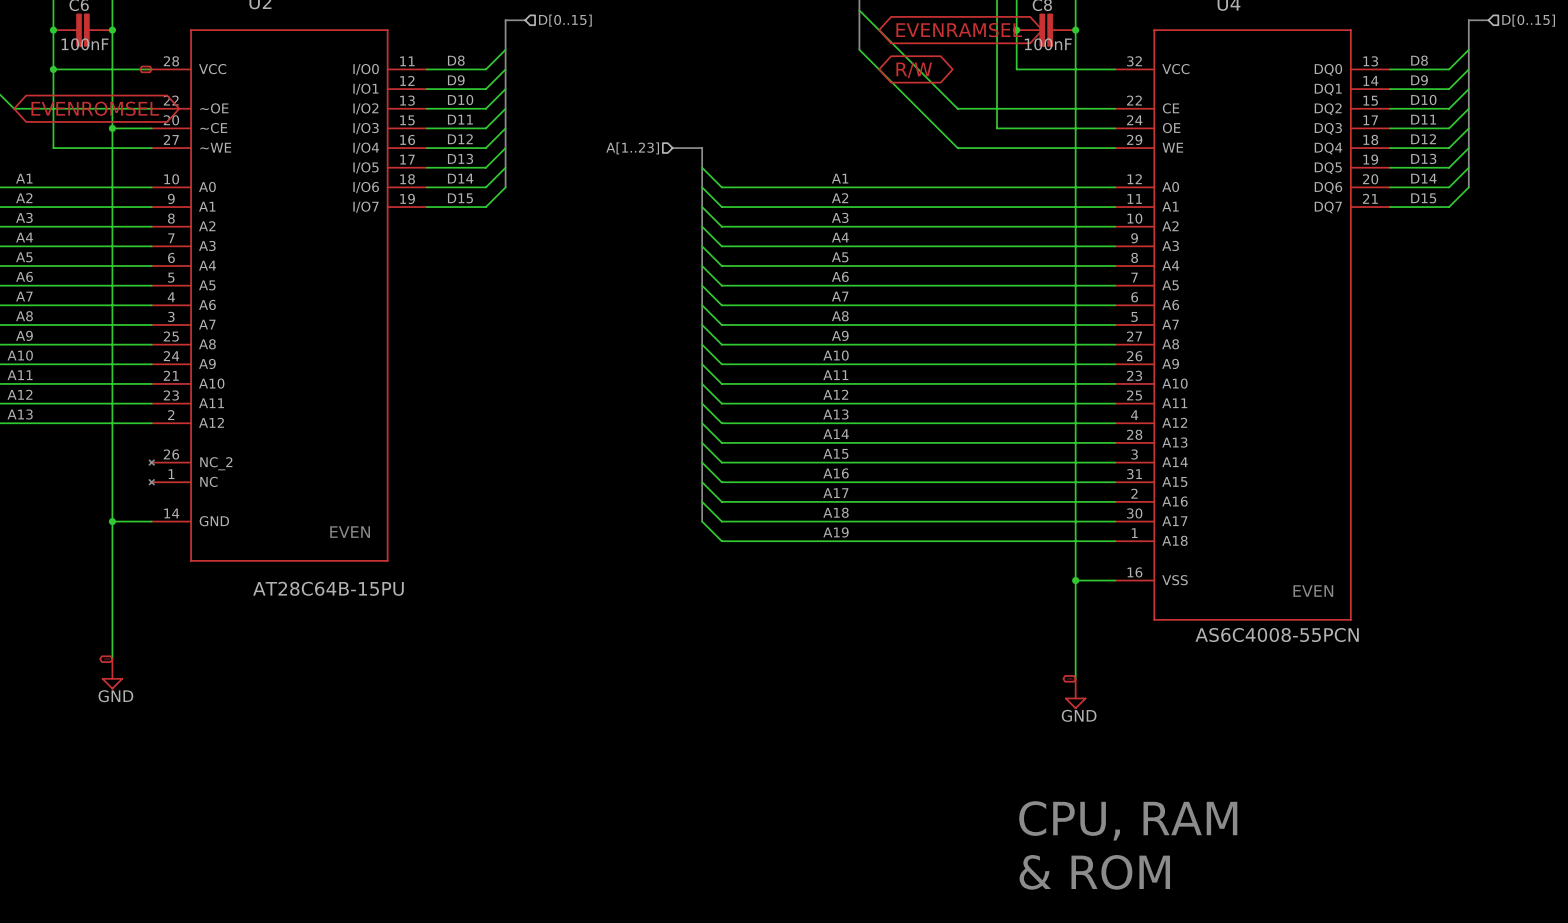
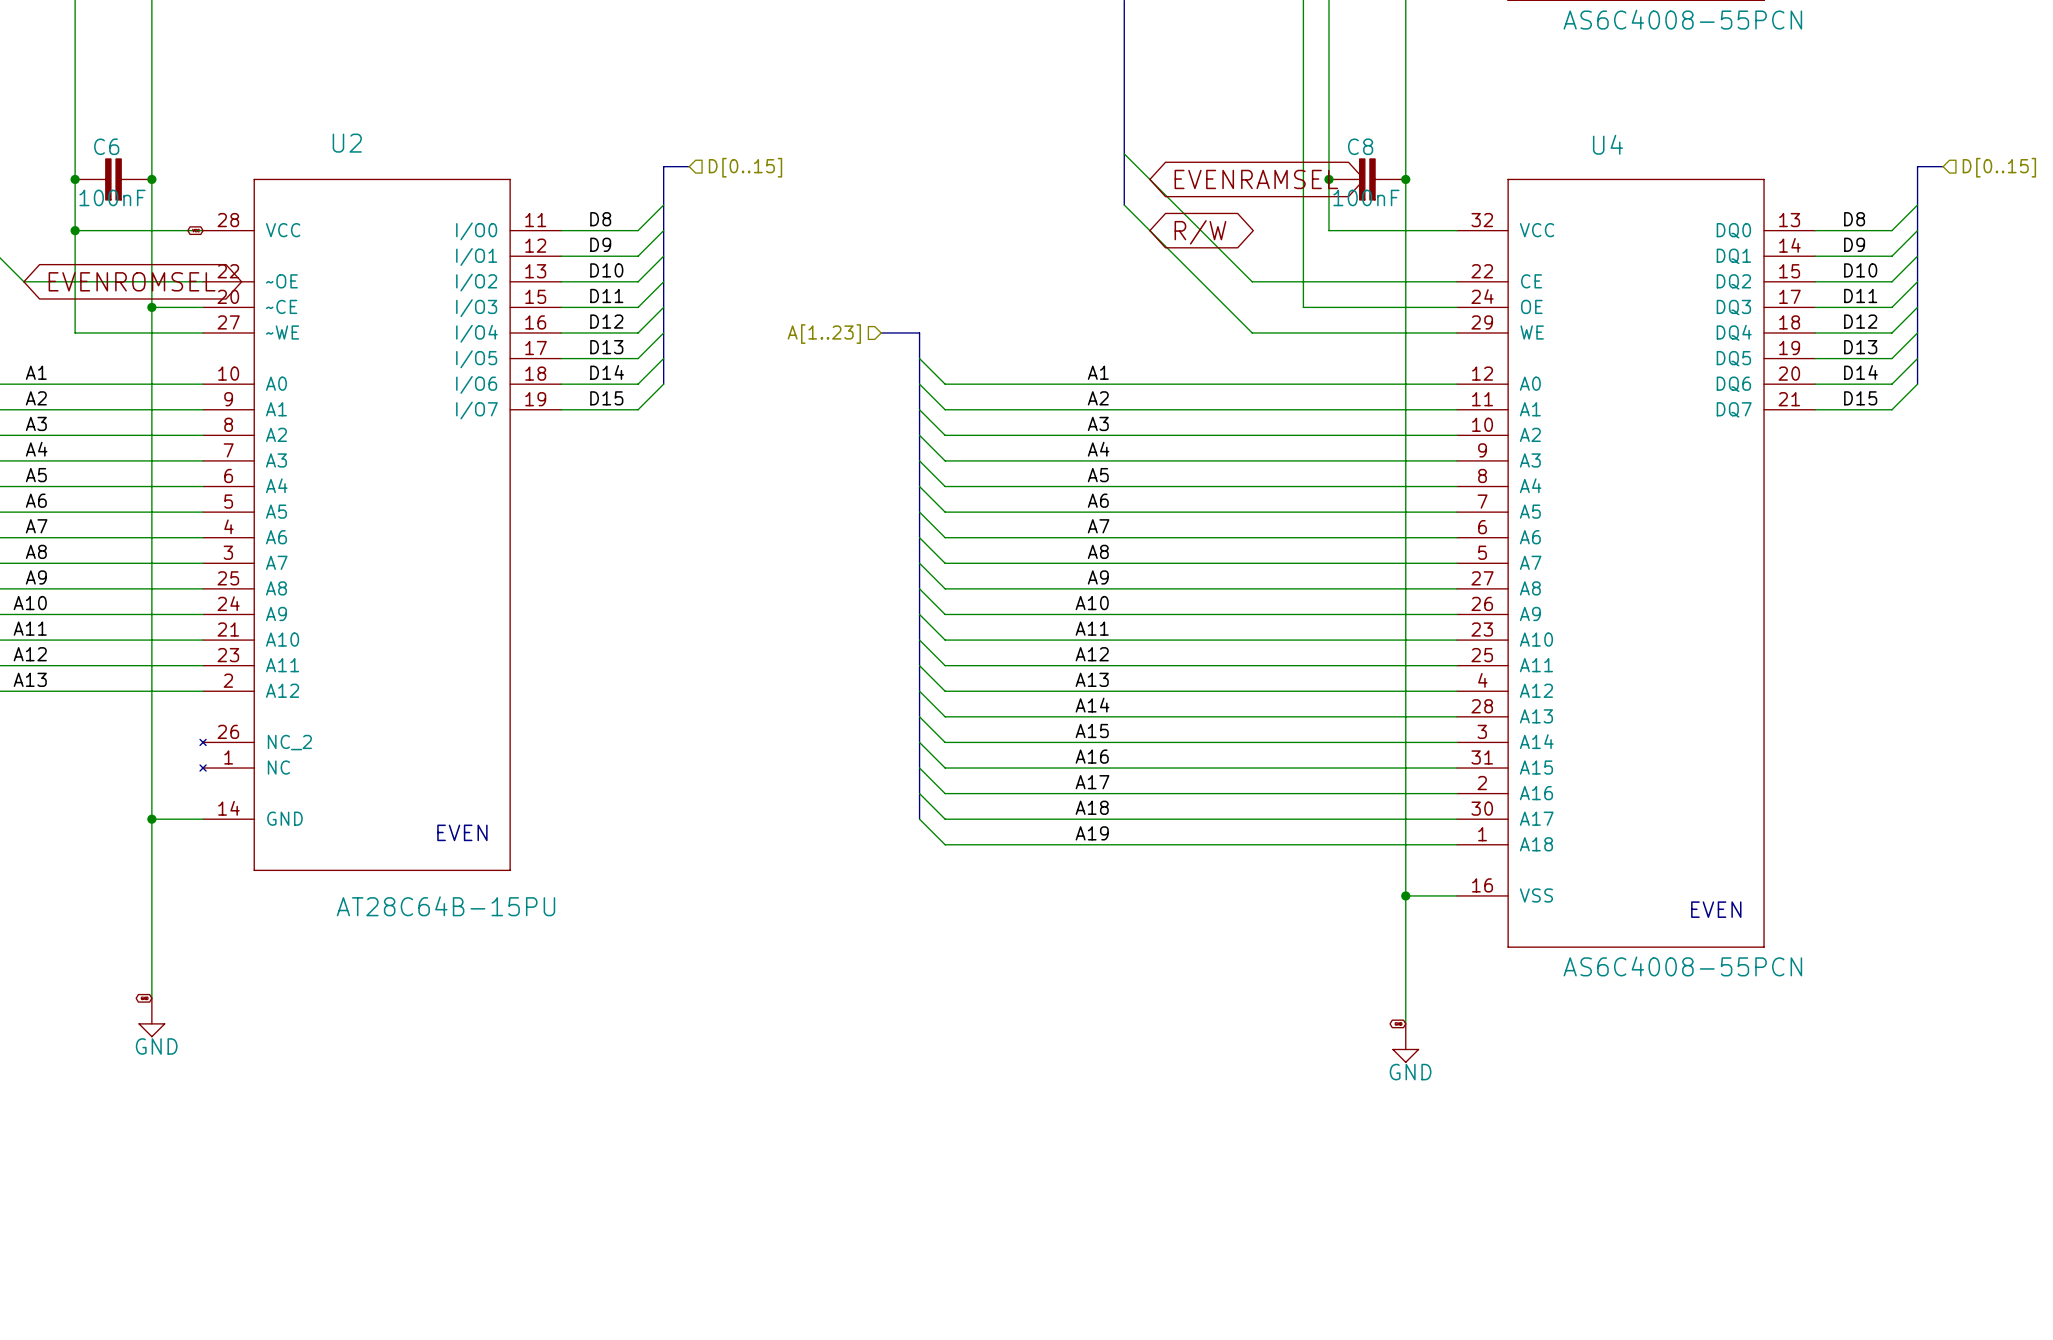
text: CPU, RAM (1128, 820) -> none
text: & ROM (1094, 872) -> none

